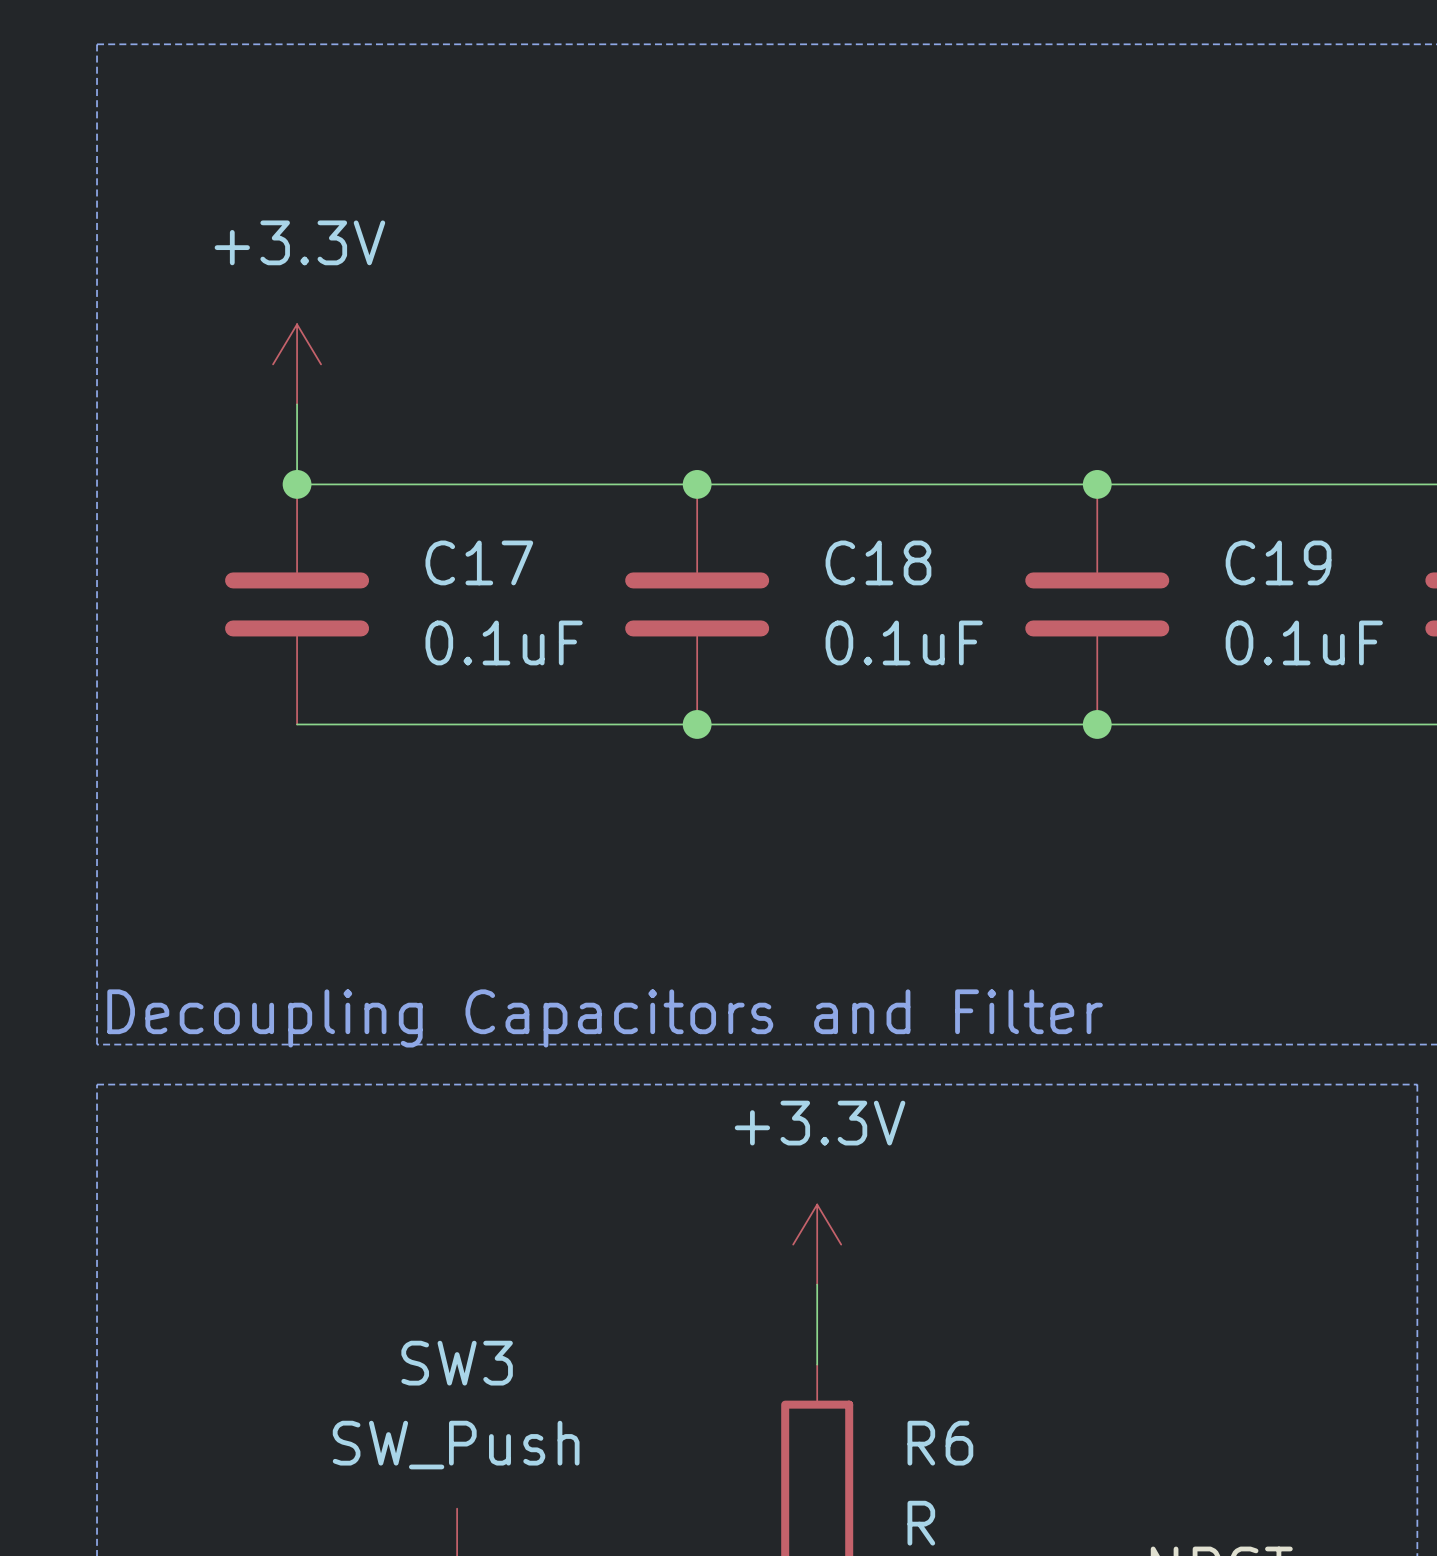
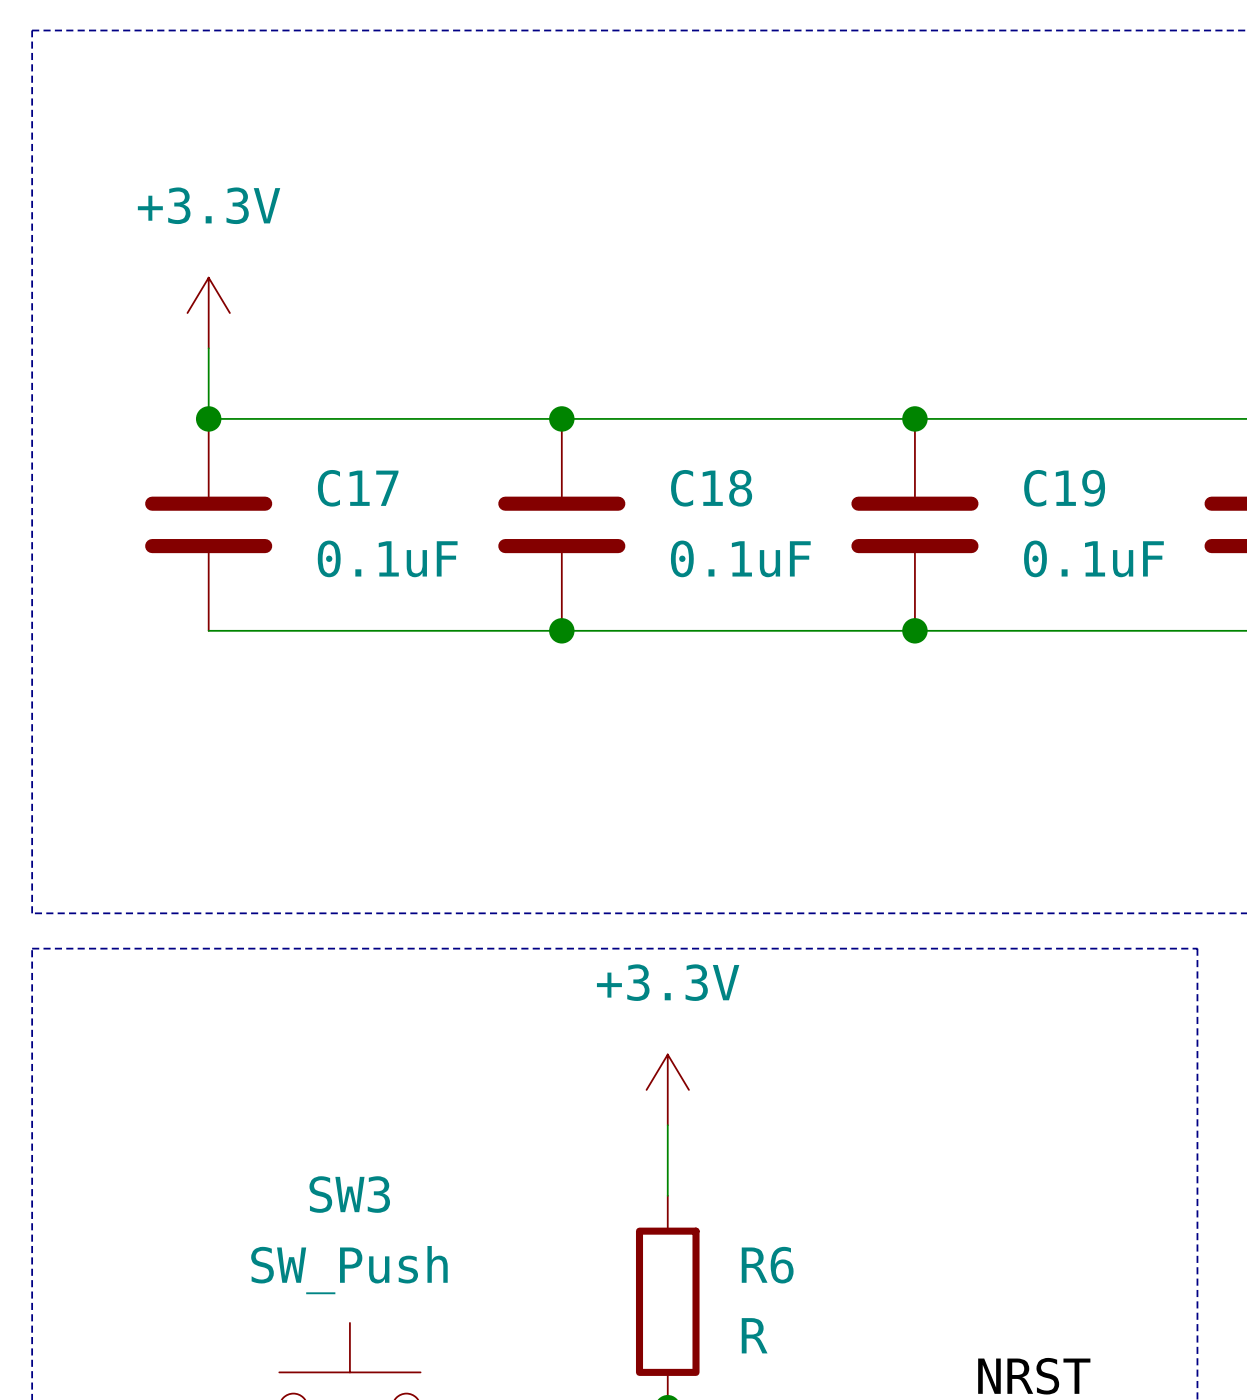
text: Decoupling Capacitors and Filter (605, 1018) -> none

